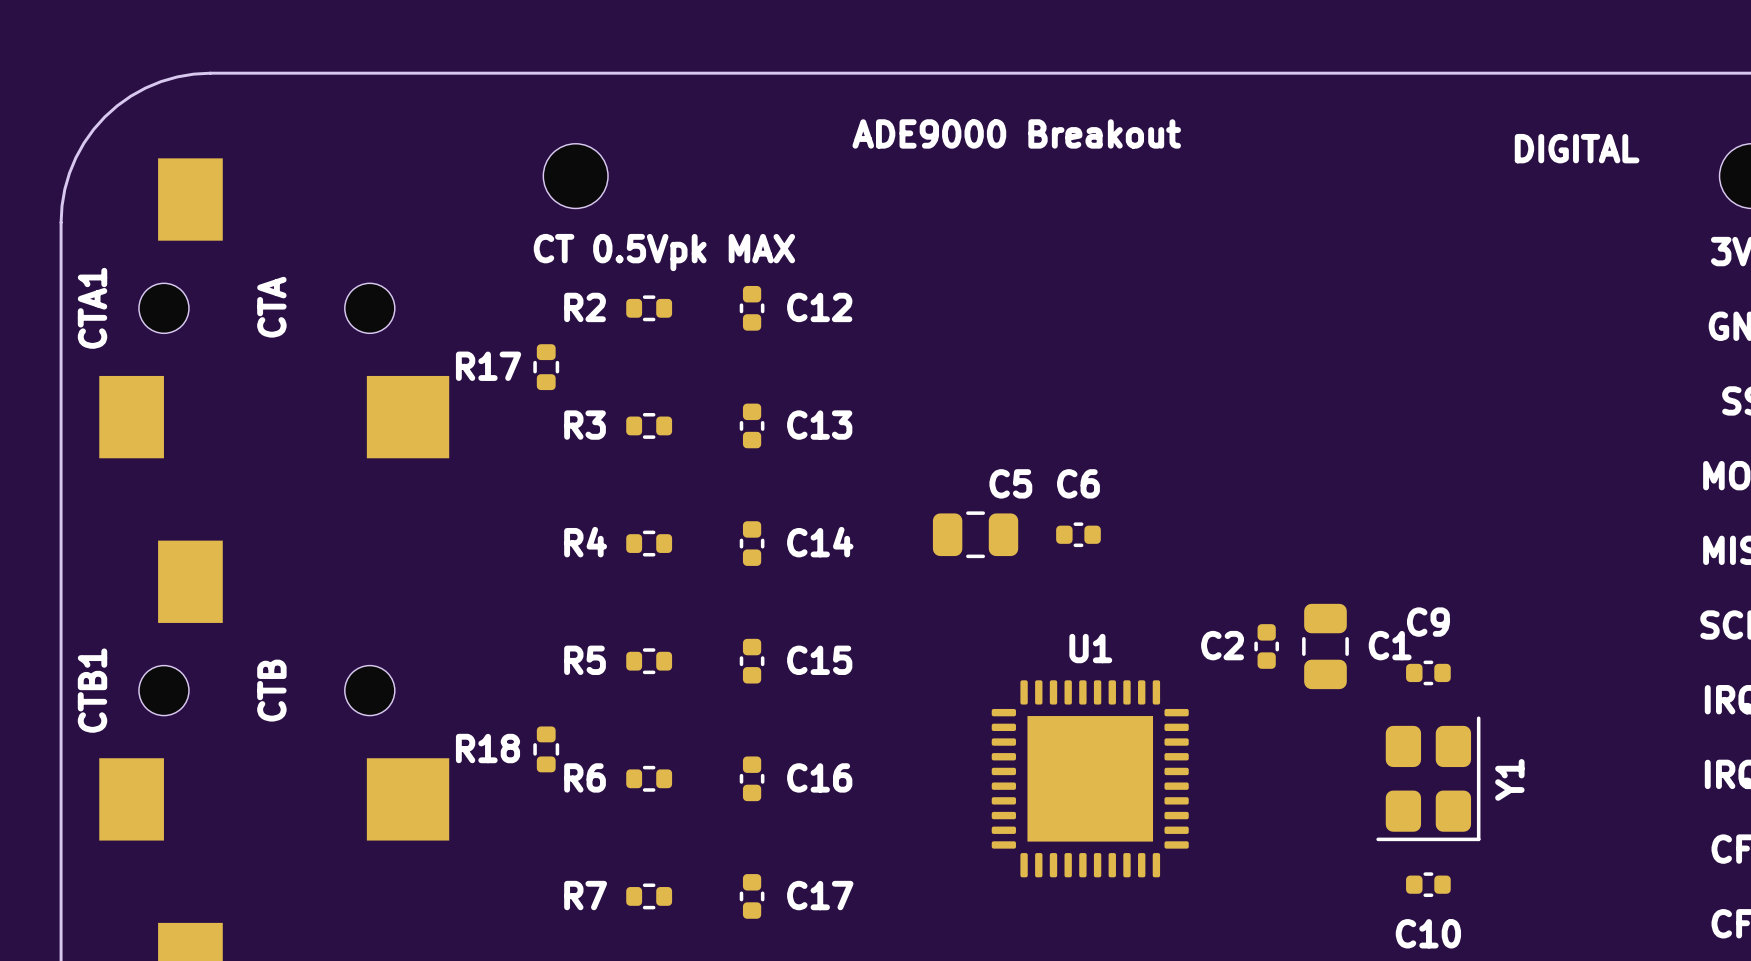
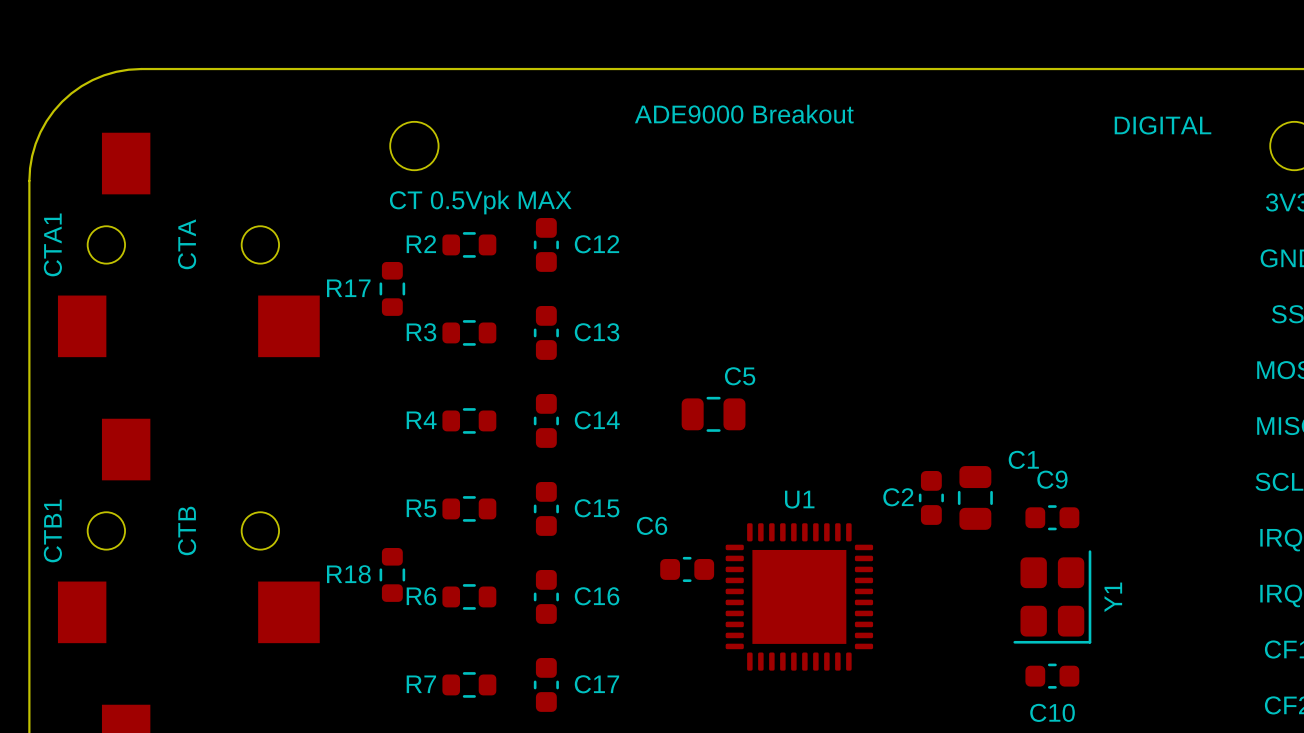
C12 footprint: [739, 285, 765, 331] -> [533, 217, 559, 272]
R2 footprint: [626, 295, 673, 322] -> [442, 232, 497, 258]
R17 footprint: [533, 344, 560, 391] -> [379, 261, 406, 316]
C13 footprint: [739, 403, 765, 449] -> [533, 305, 559, 360]
R3 footprint: [626, 413, 673, 439] -> [442, 320, 497, 346]
C14 footprint: [739, 521, 765, 566] -> [533, 393, 559, 448]
C6 footprint: [1056, 522, 1101, 548] -> [660, 556, 715, 582]
R4 footprint: [626, 530, 673, 557] -> [442, 408, 497, 434]
C2 footprint: [1254, 624, 1280, 669] -> [918, 470, 944, 525]
C15 footprint: [739, 638, 765, 684] -> [533, 481, 559, 536]
C1 name position: C1 (1390, 645) -> C1 (1023, 459)
R5 footprint: [626, 648, 673, 675] -> [442, 496, 497, 522]
C9 footprint: [1406, 660, 1451, 686] -> [1025, 505, 1080, 531]
R18 footprint: [533, 726, 560, 773] -> [379, 547, 406, 602]
C16 footprint: [739, 756, 765, 802] -> [533, 569, 559, 624]
R6 footprint: [626, 765, 673, 792] -> [442, 584, 497, 610]
C10 footprint: [1406, 872, 1451, 898] -> [1025, 663, 1080, 689]
C17 footprint: [739, 874, 765, 919] -> [533, 658, 559, 712]
R7 footprint: [626, 883, 673, 910] -> [442, 672, 497, 698]

